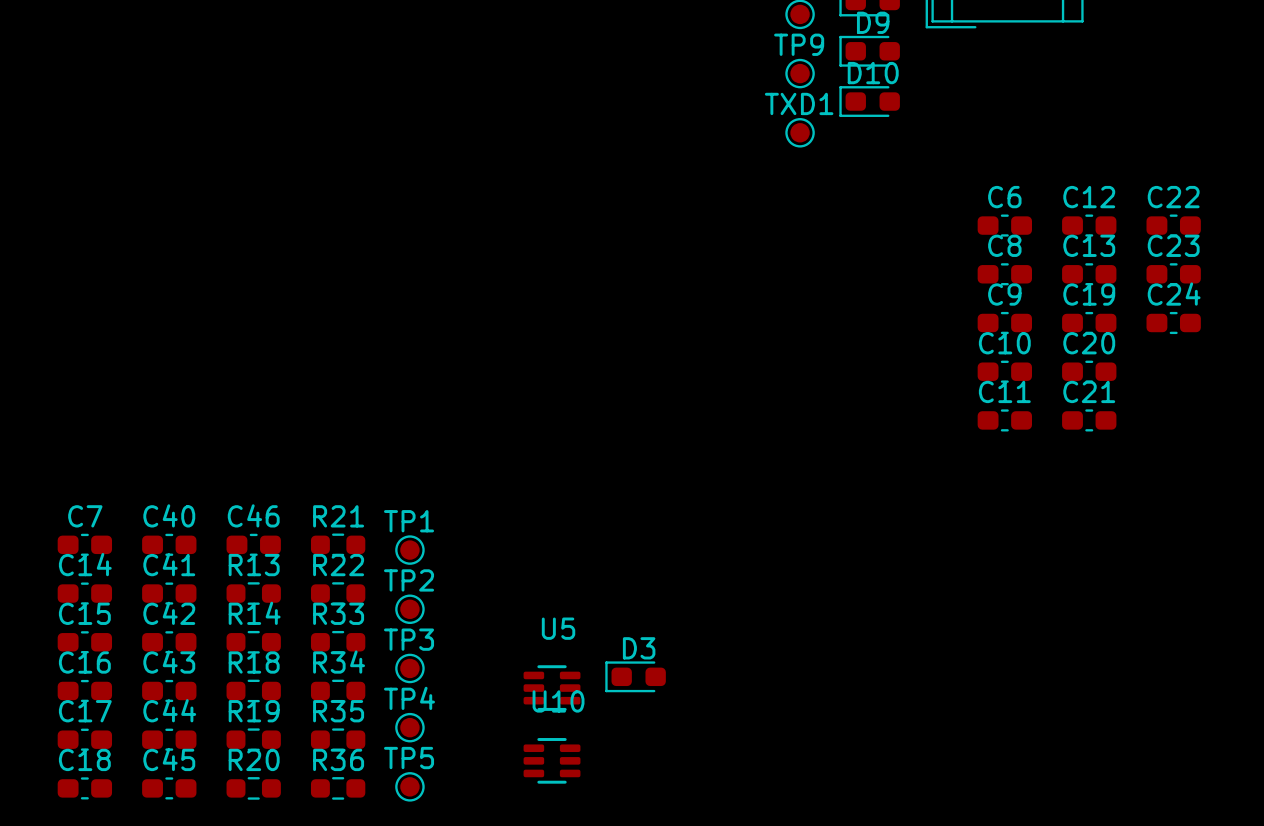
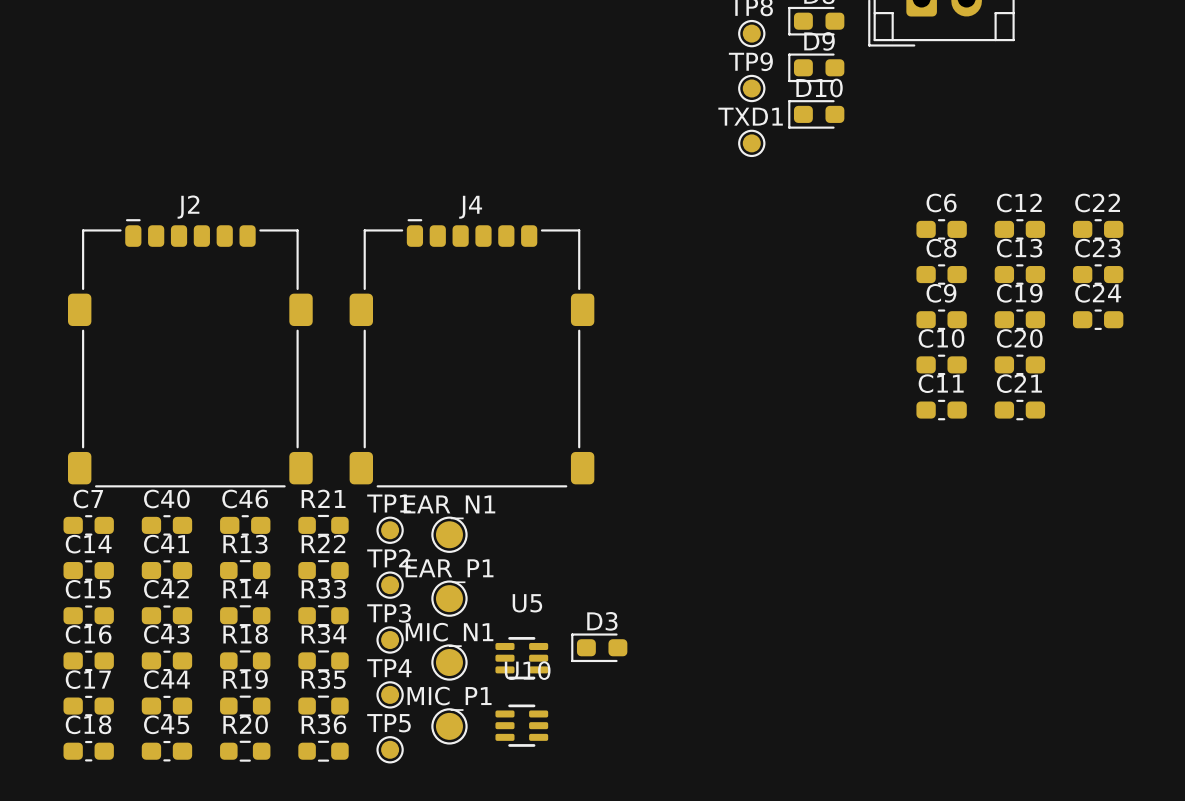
J2: none -> (190, 353)
J4: none -> (471, 353)
EAR_N1: none -> (449, 534)
EAR_P1: none -> (449, 598)
MIC_N1: none -> (449, 662)
MIC_P1: none -> (449, 726)

